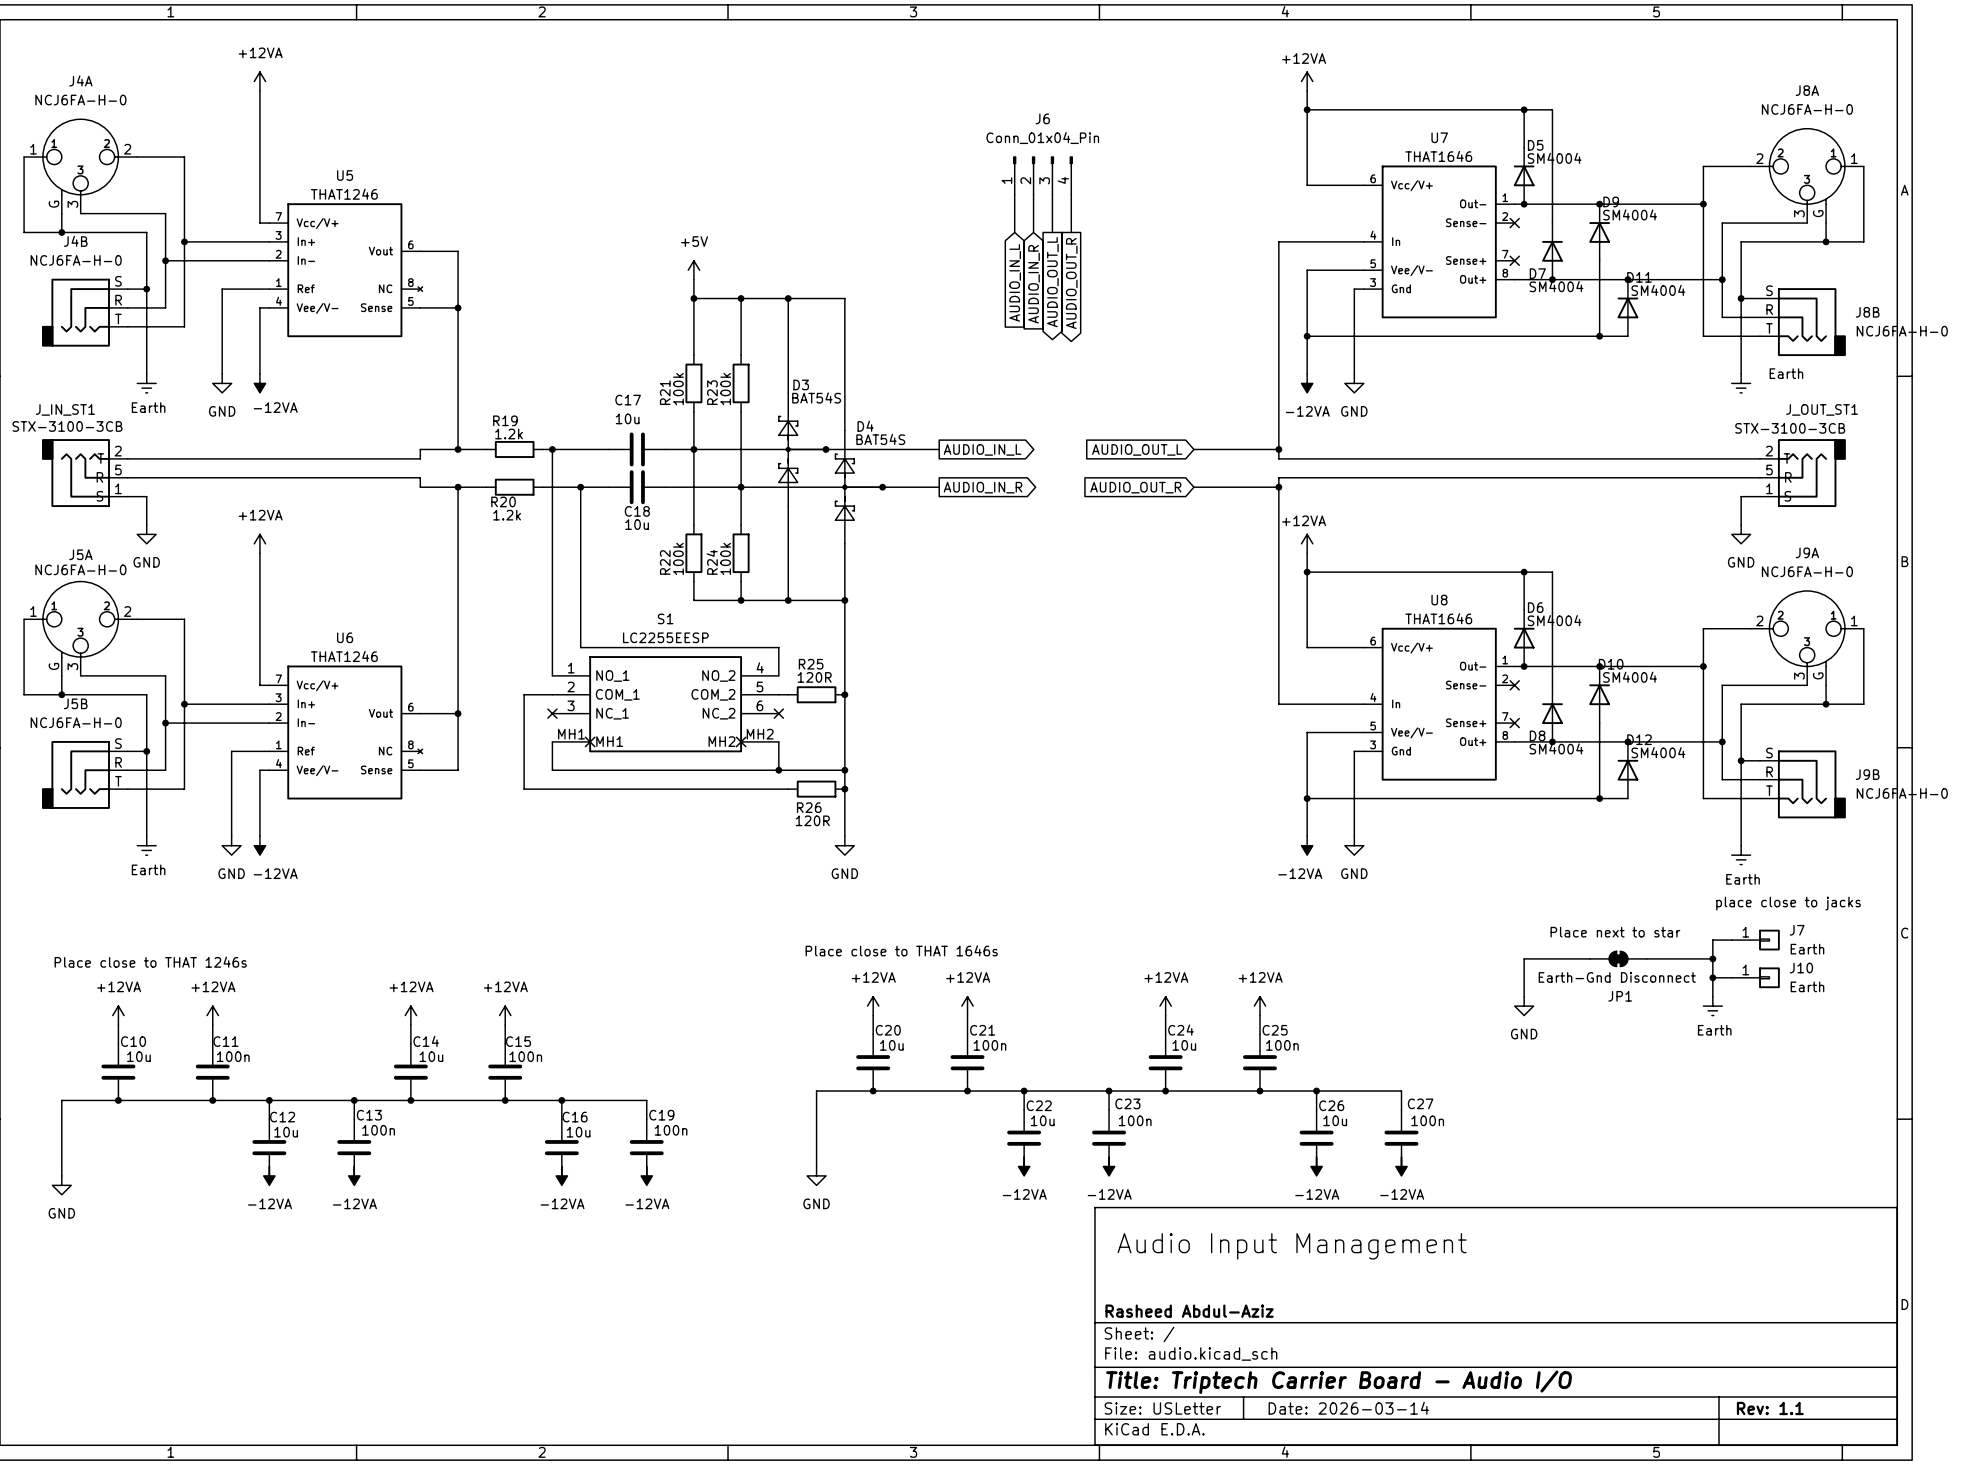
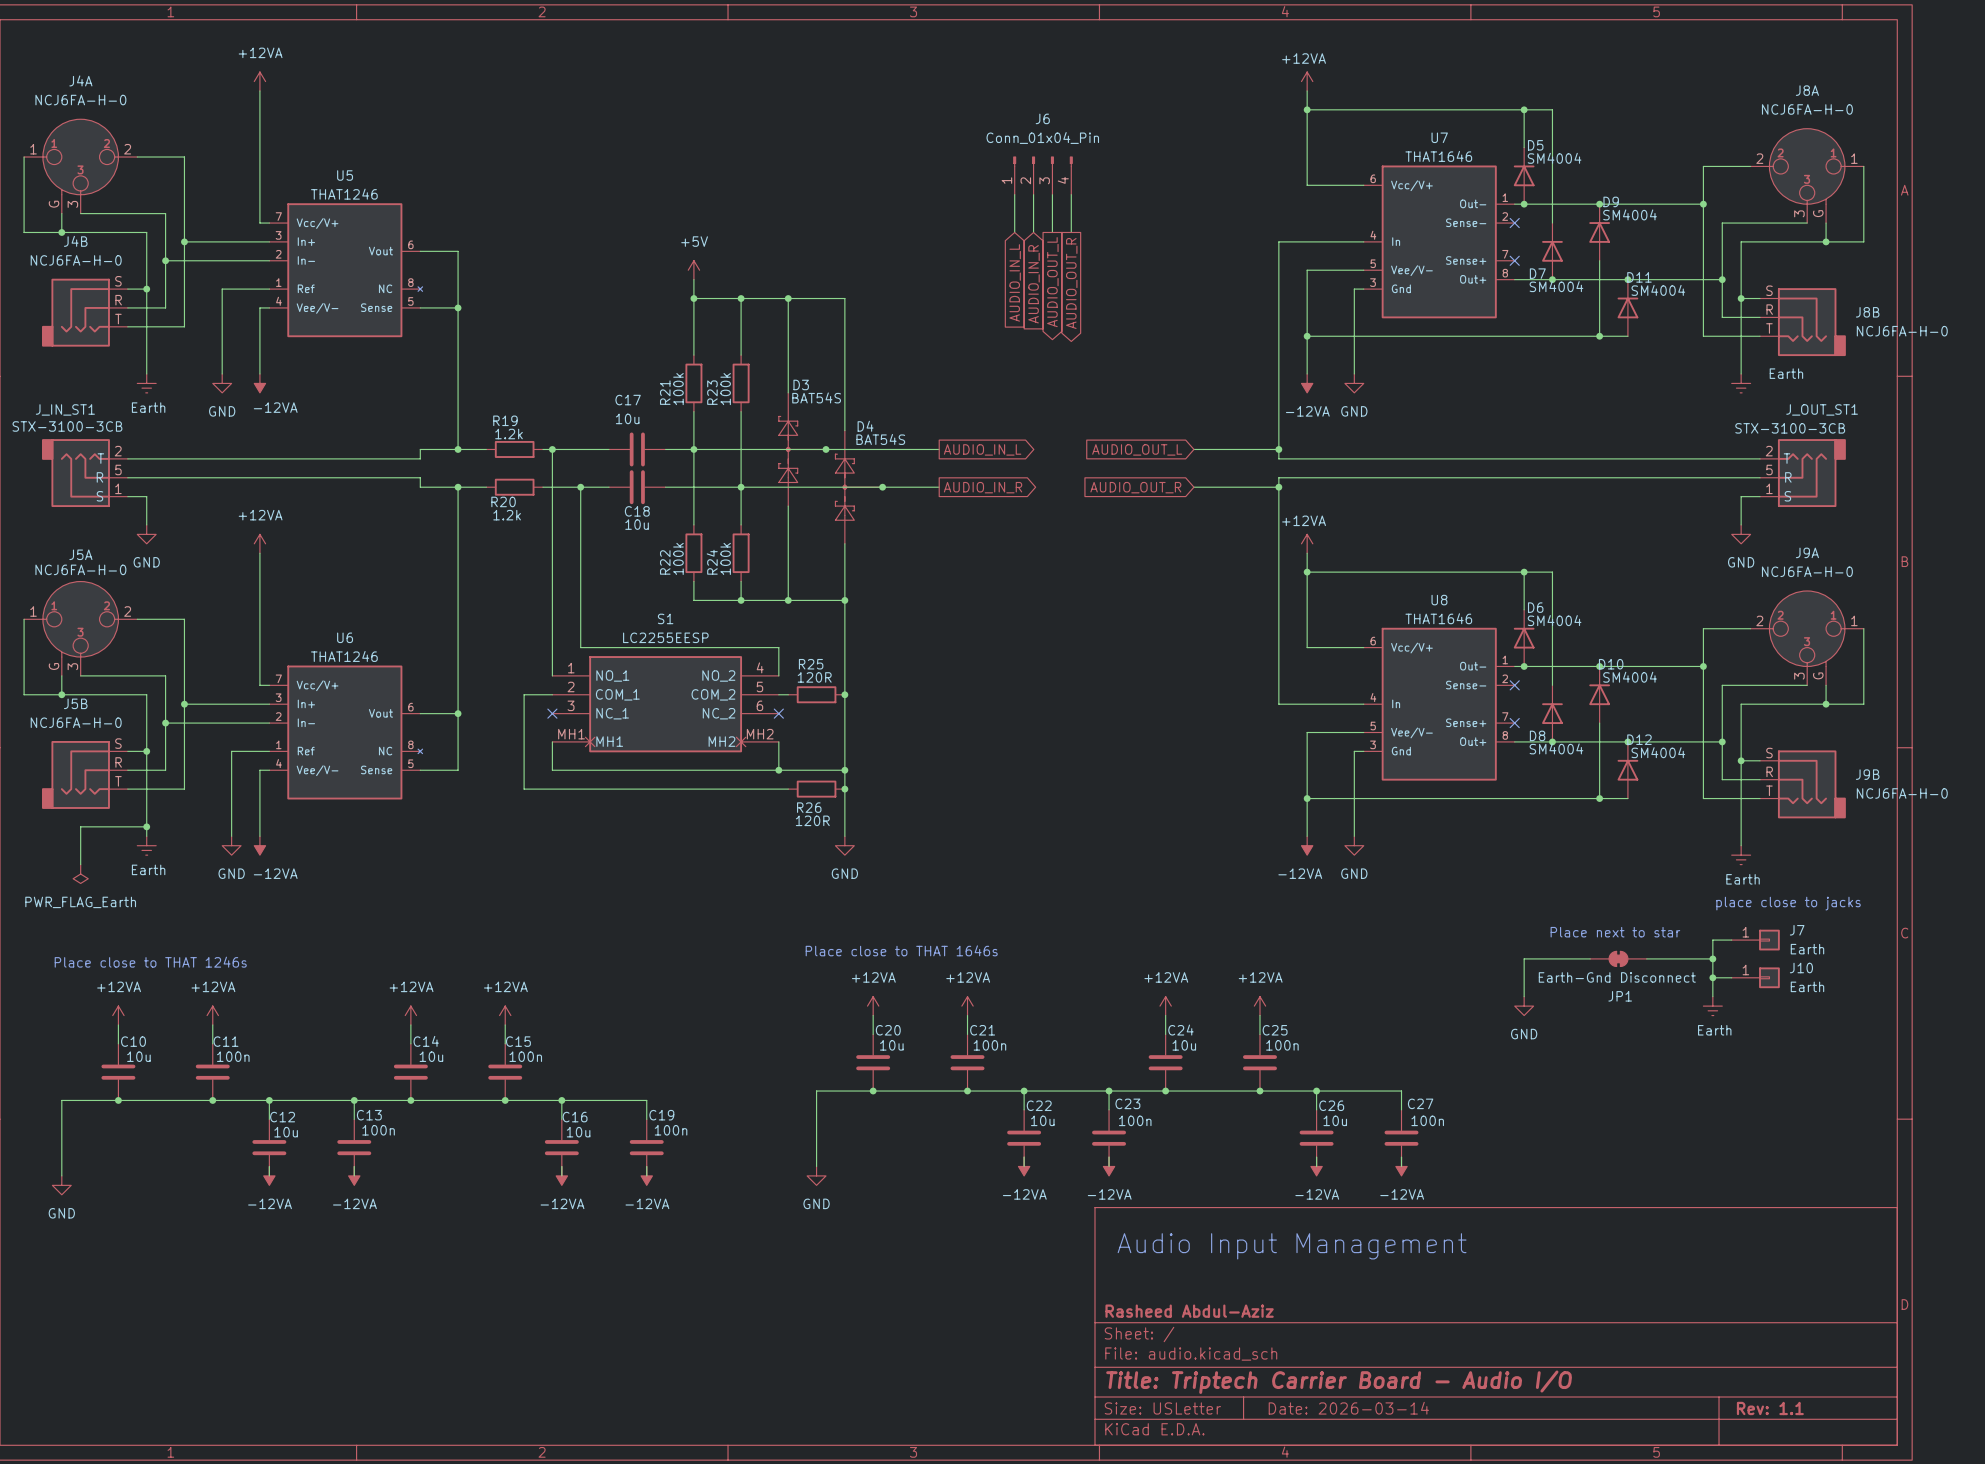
wire: none -> (146, 826) (80, 826) (80, 864)
junction: none -> (146, 826)
power symbol: none -> PWR_FLAG_Earth (80, 874)

